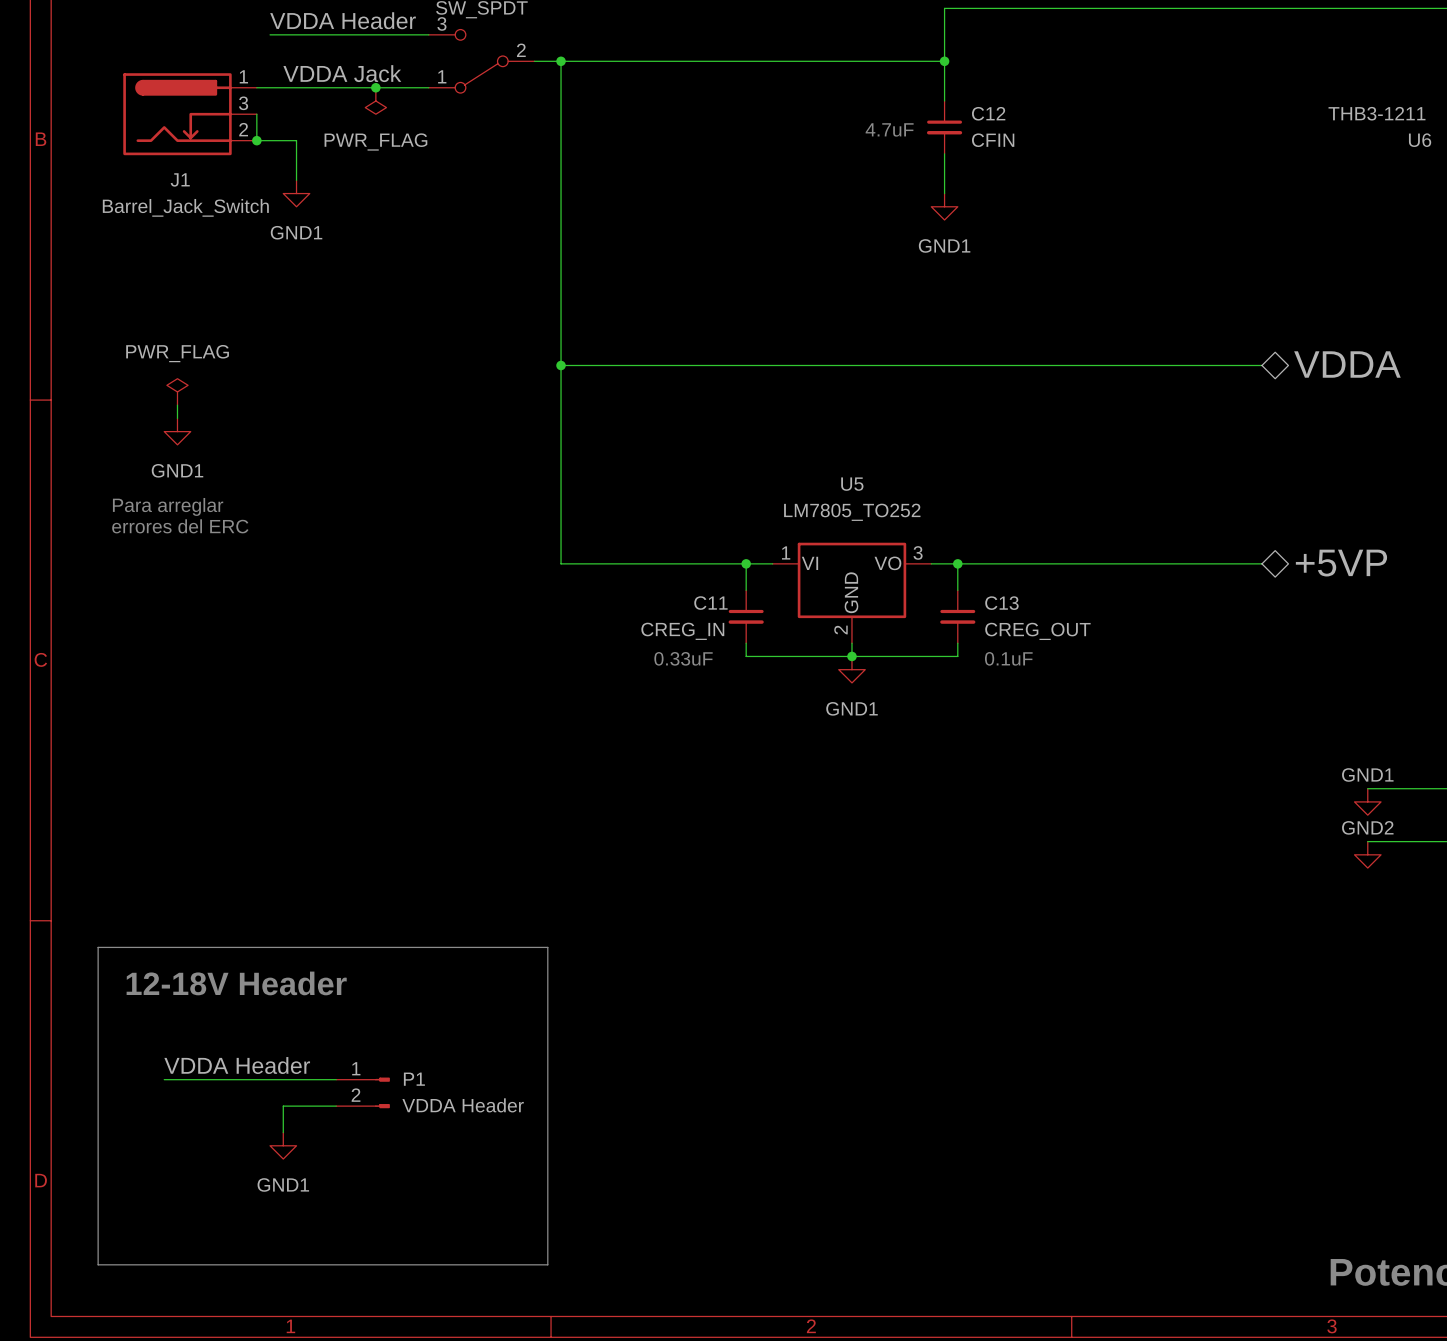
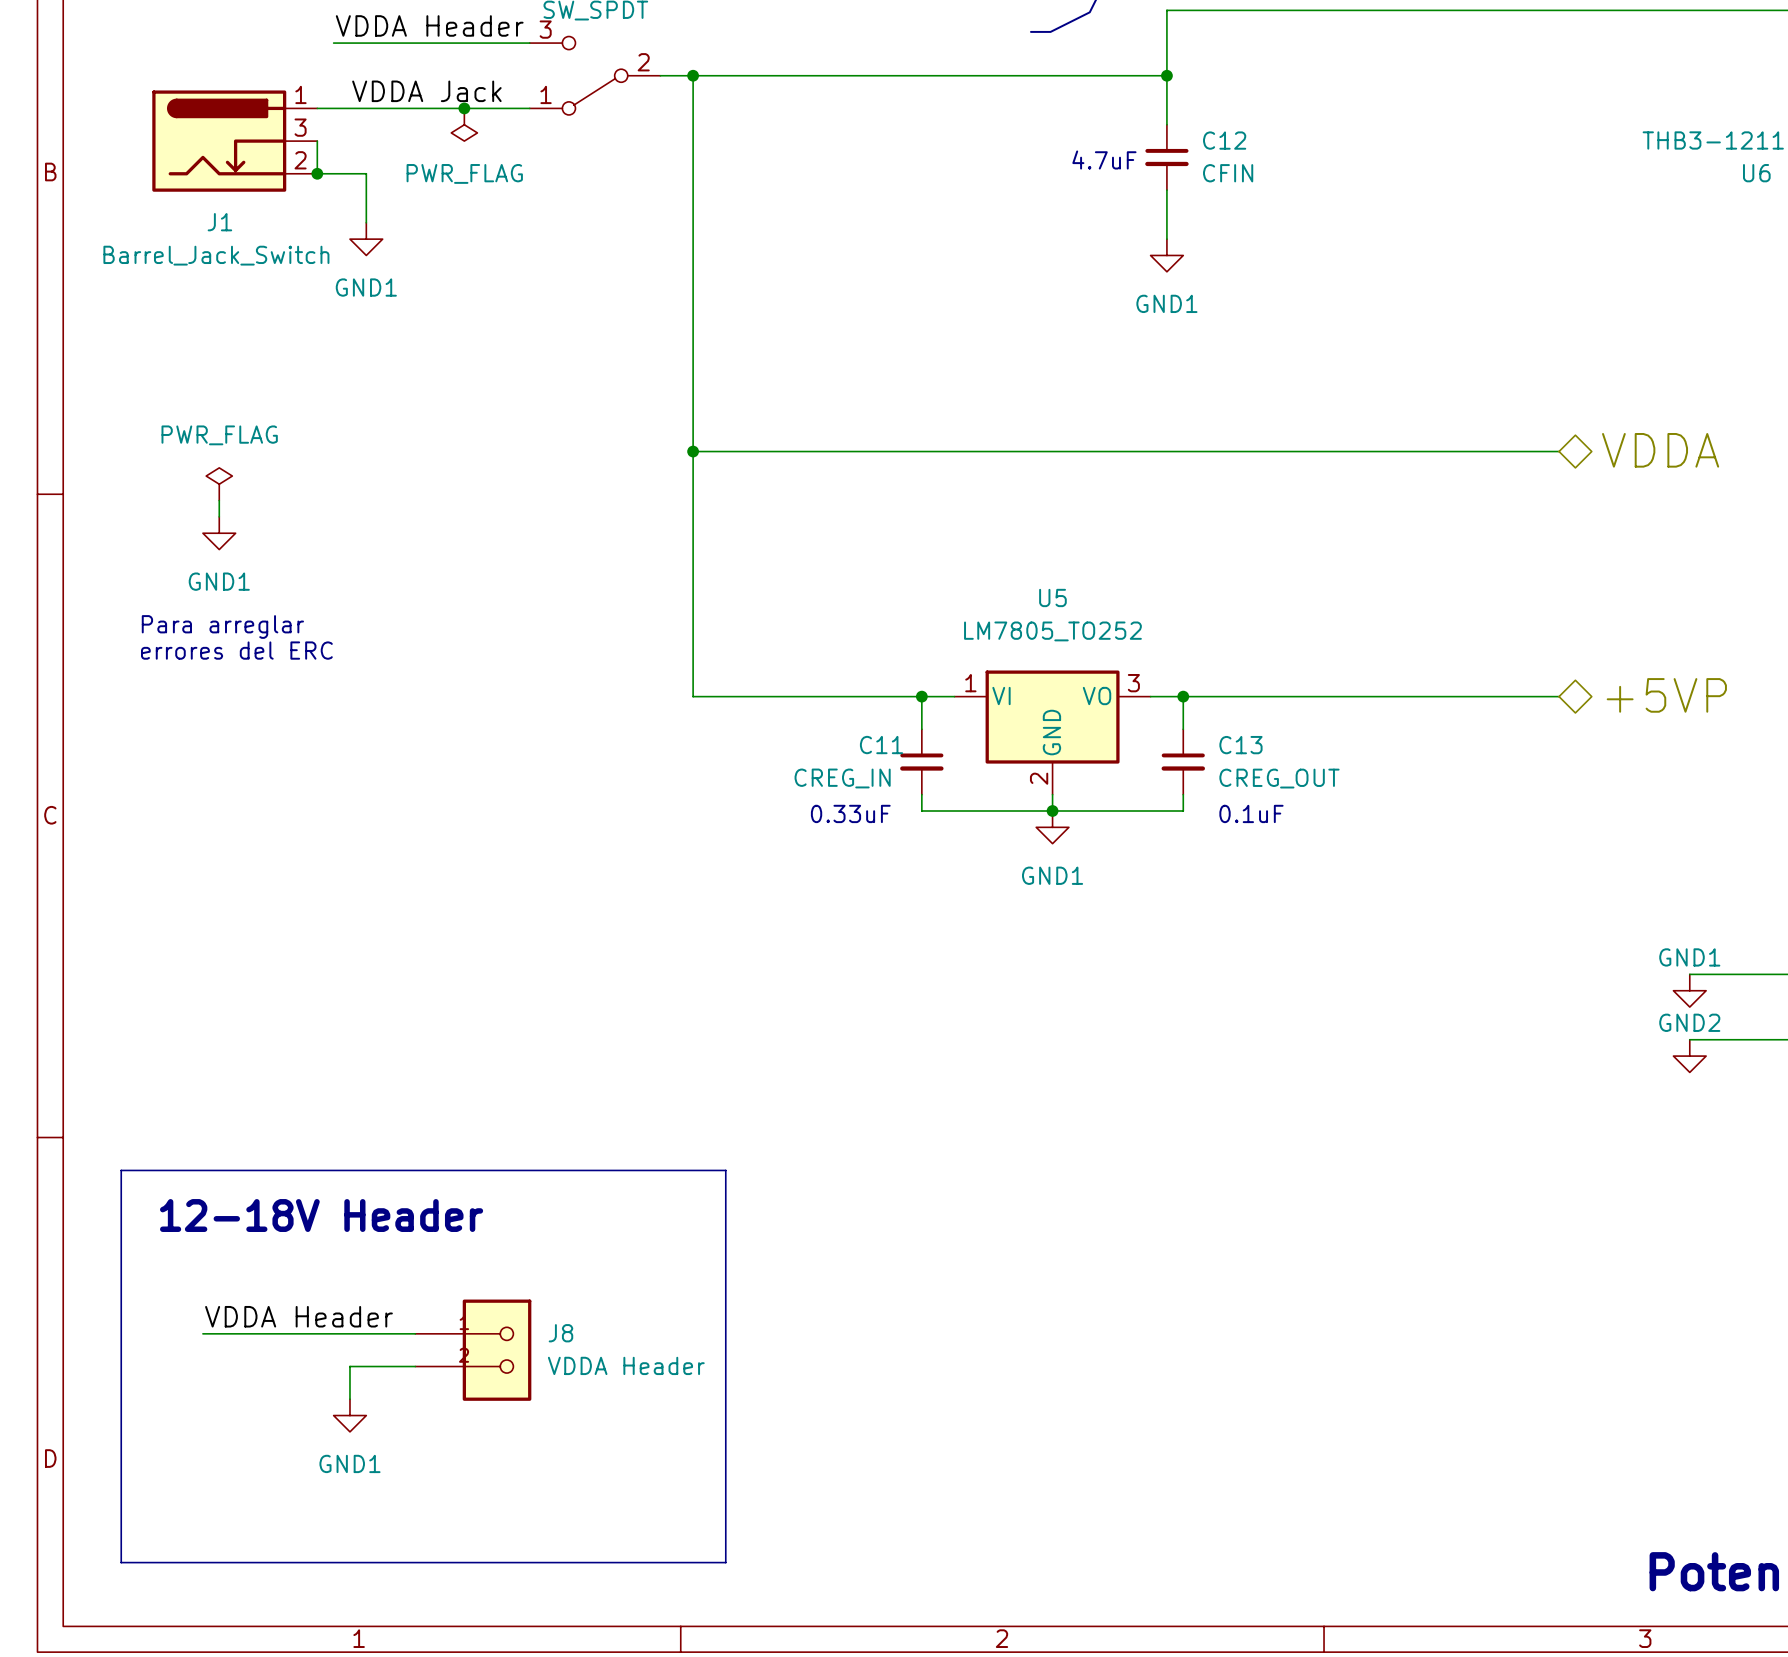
line: (547, 947) (547, 1264) -> (676, 1170) (725, 1170) (725, 1562) (676, 1562)
P1: VDDA Header (363, 1092) -> none
J8: none -> VDDA Header (473, 1350)

